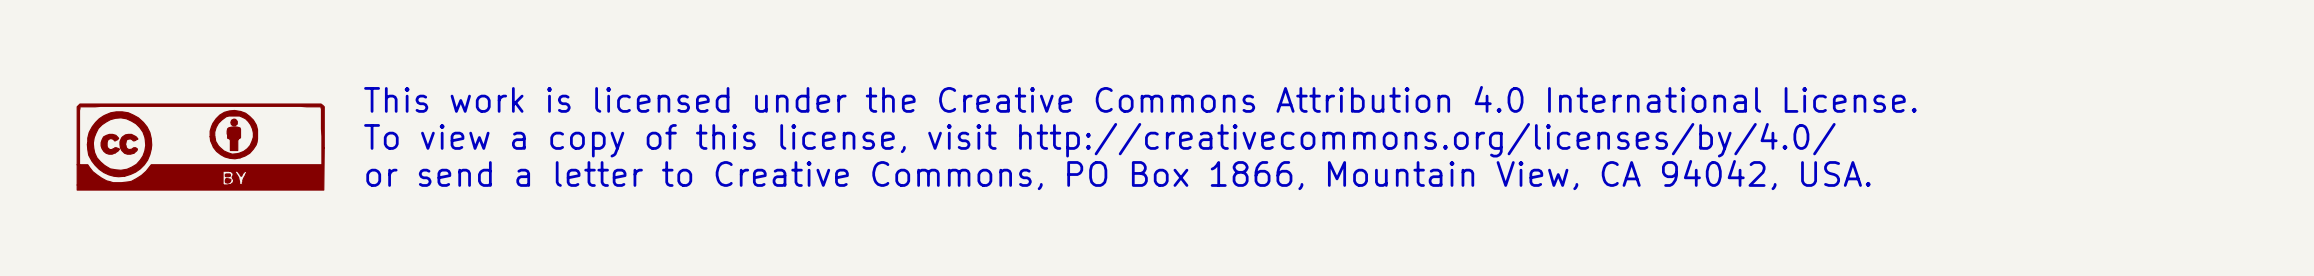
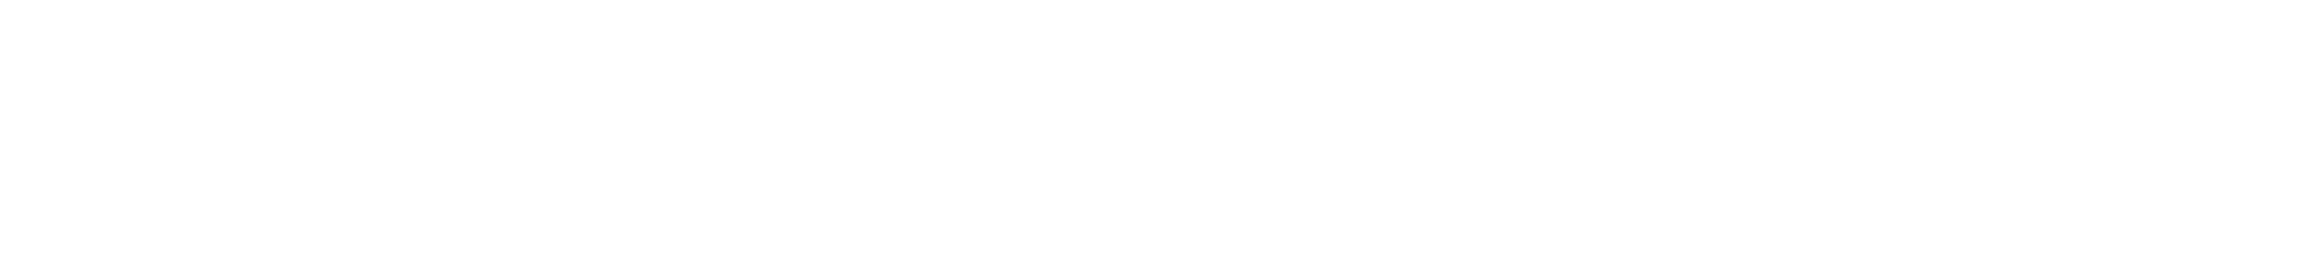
text: This work is licensed under the Creative Commons Attribution 4.0 International License. (1140, 99) -> none
text: To view a copy of this license, visit http://creativecommons.org/licenses/by/4.0/ (1099, 140) -> none
part: (200, 147) -> none
text: or send a letter to Creative Commons, PO Box 1866, Mountain View, CA 94042, USA. (1118, 175) -> none

